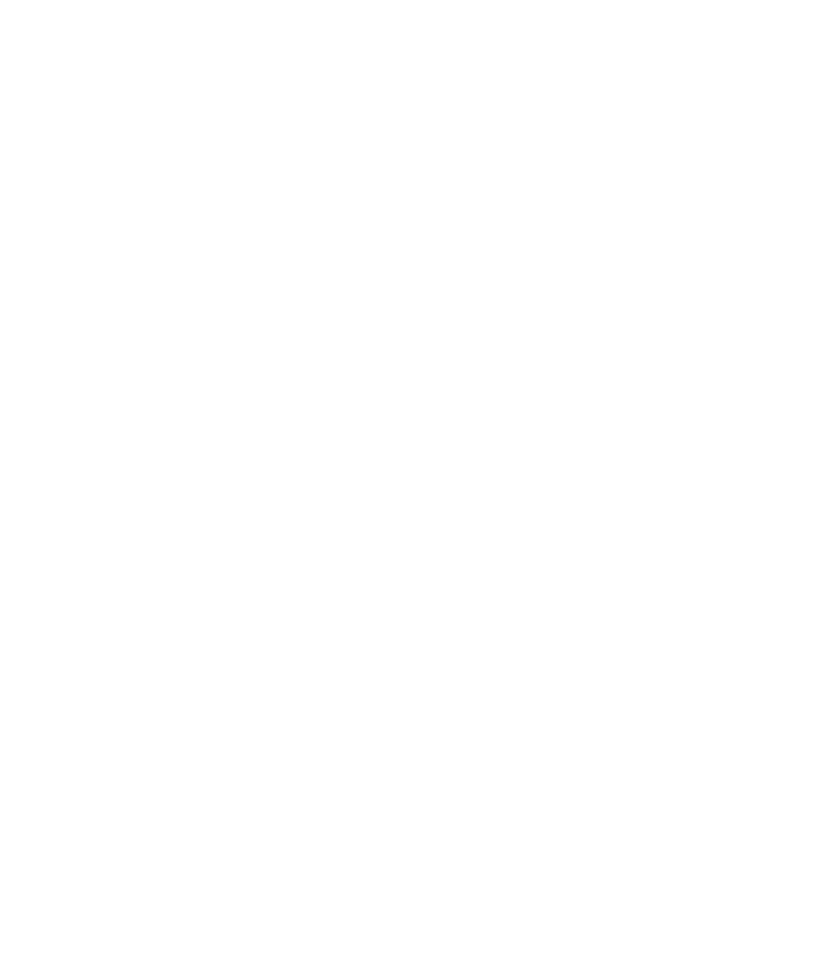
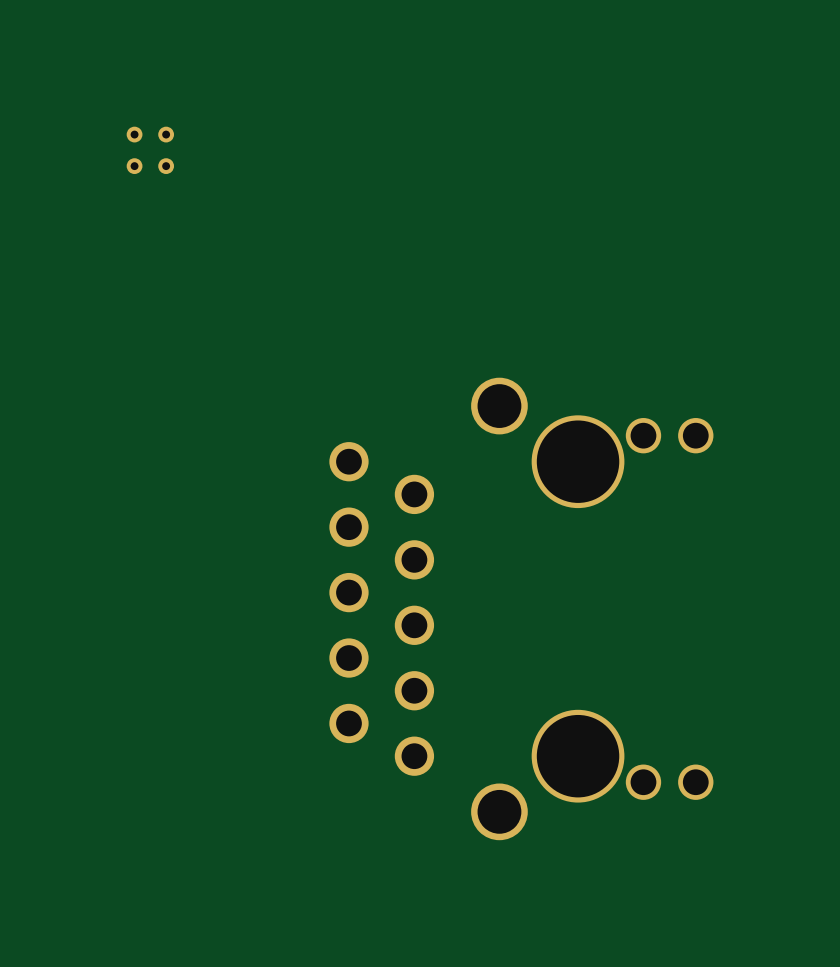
part: none -> (150, 150)
part: none -> (521, 608)

